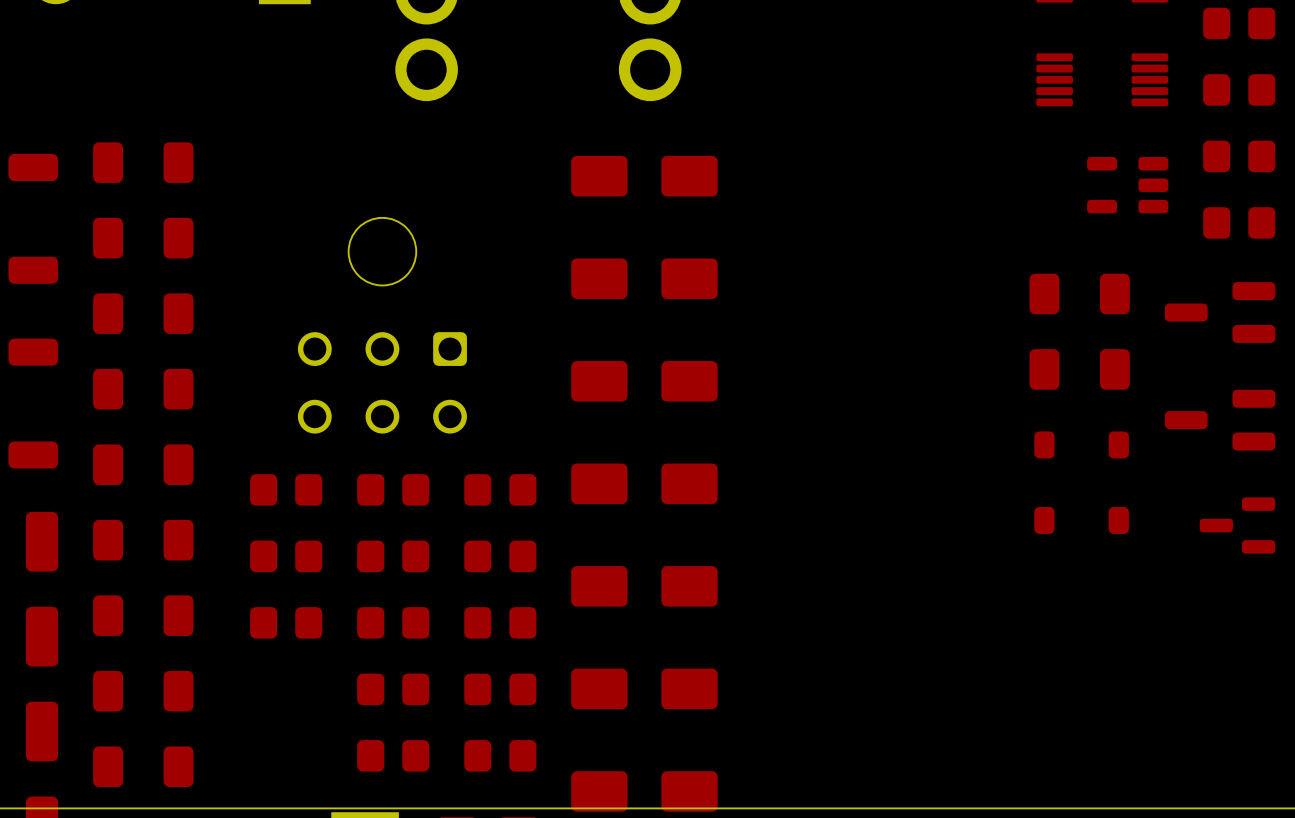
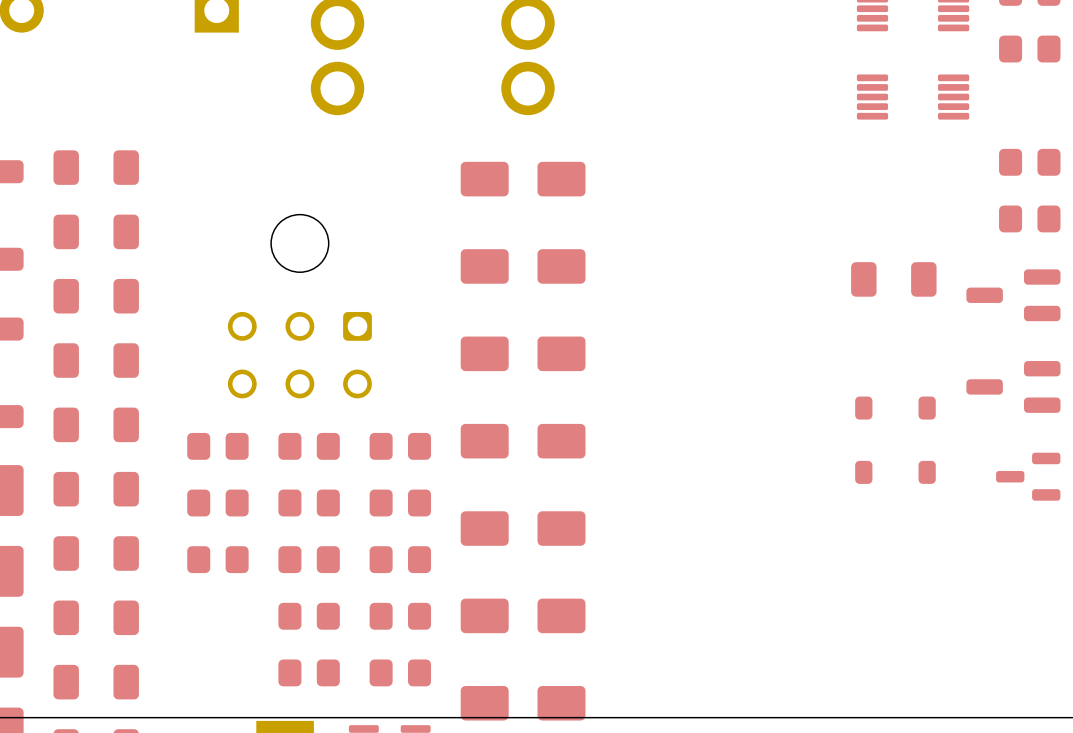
part: (1239, 89) -> none
part: (1127, 185) -> none
part: (1079, 369) -> none

